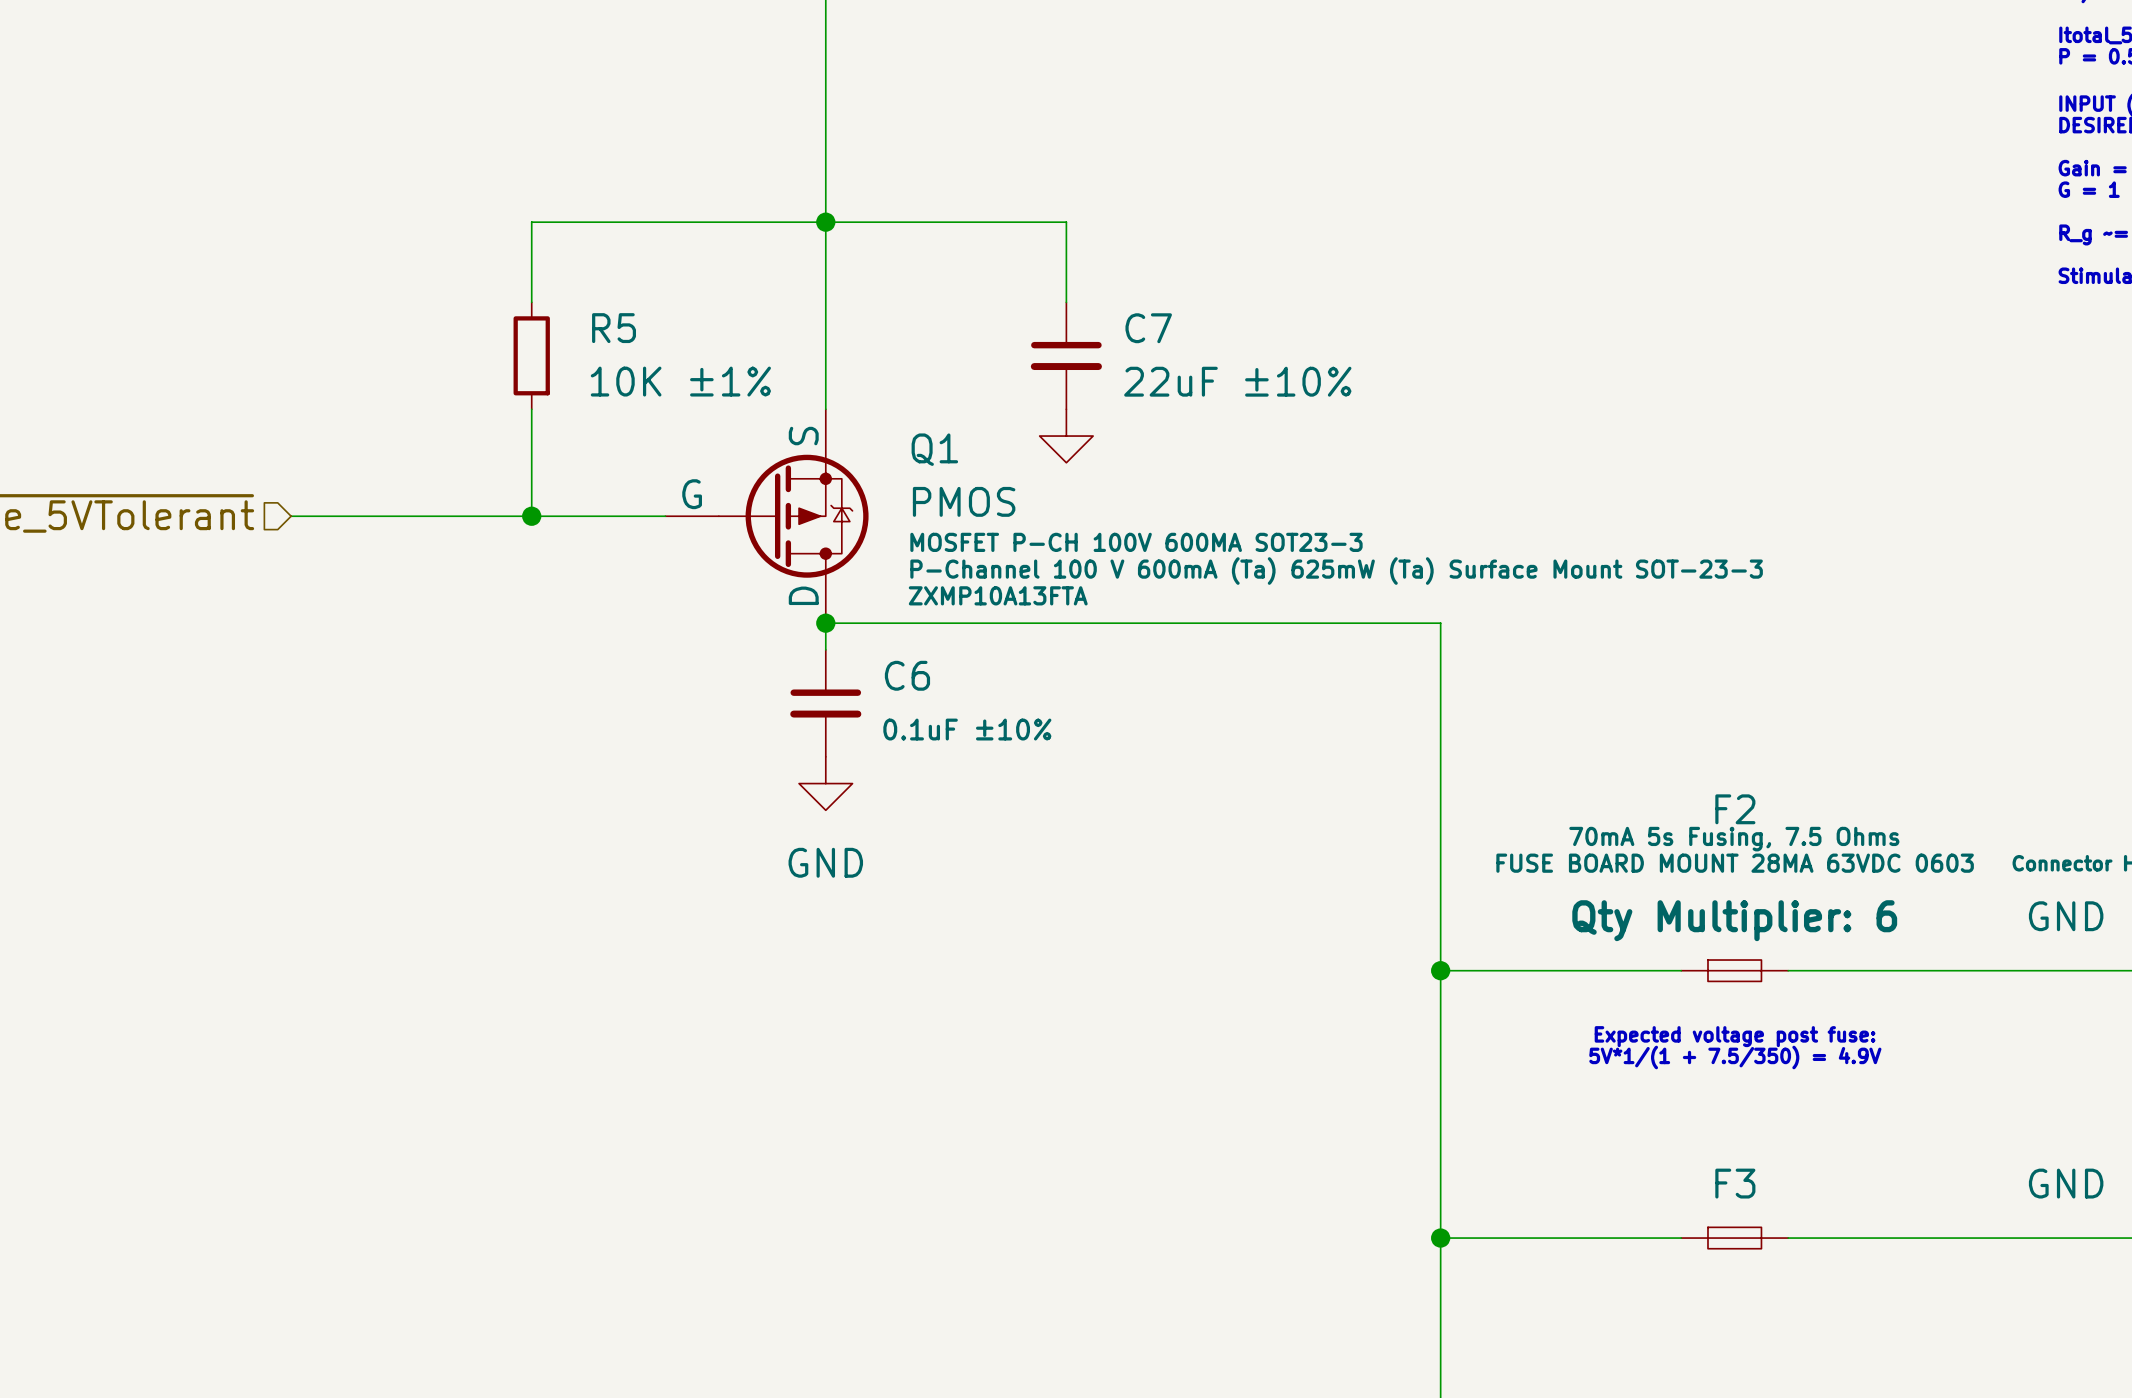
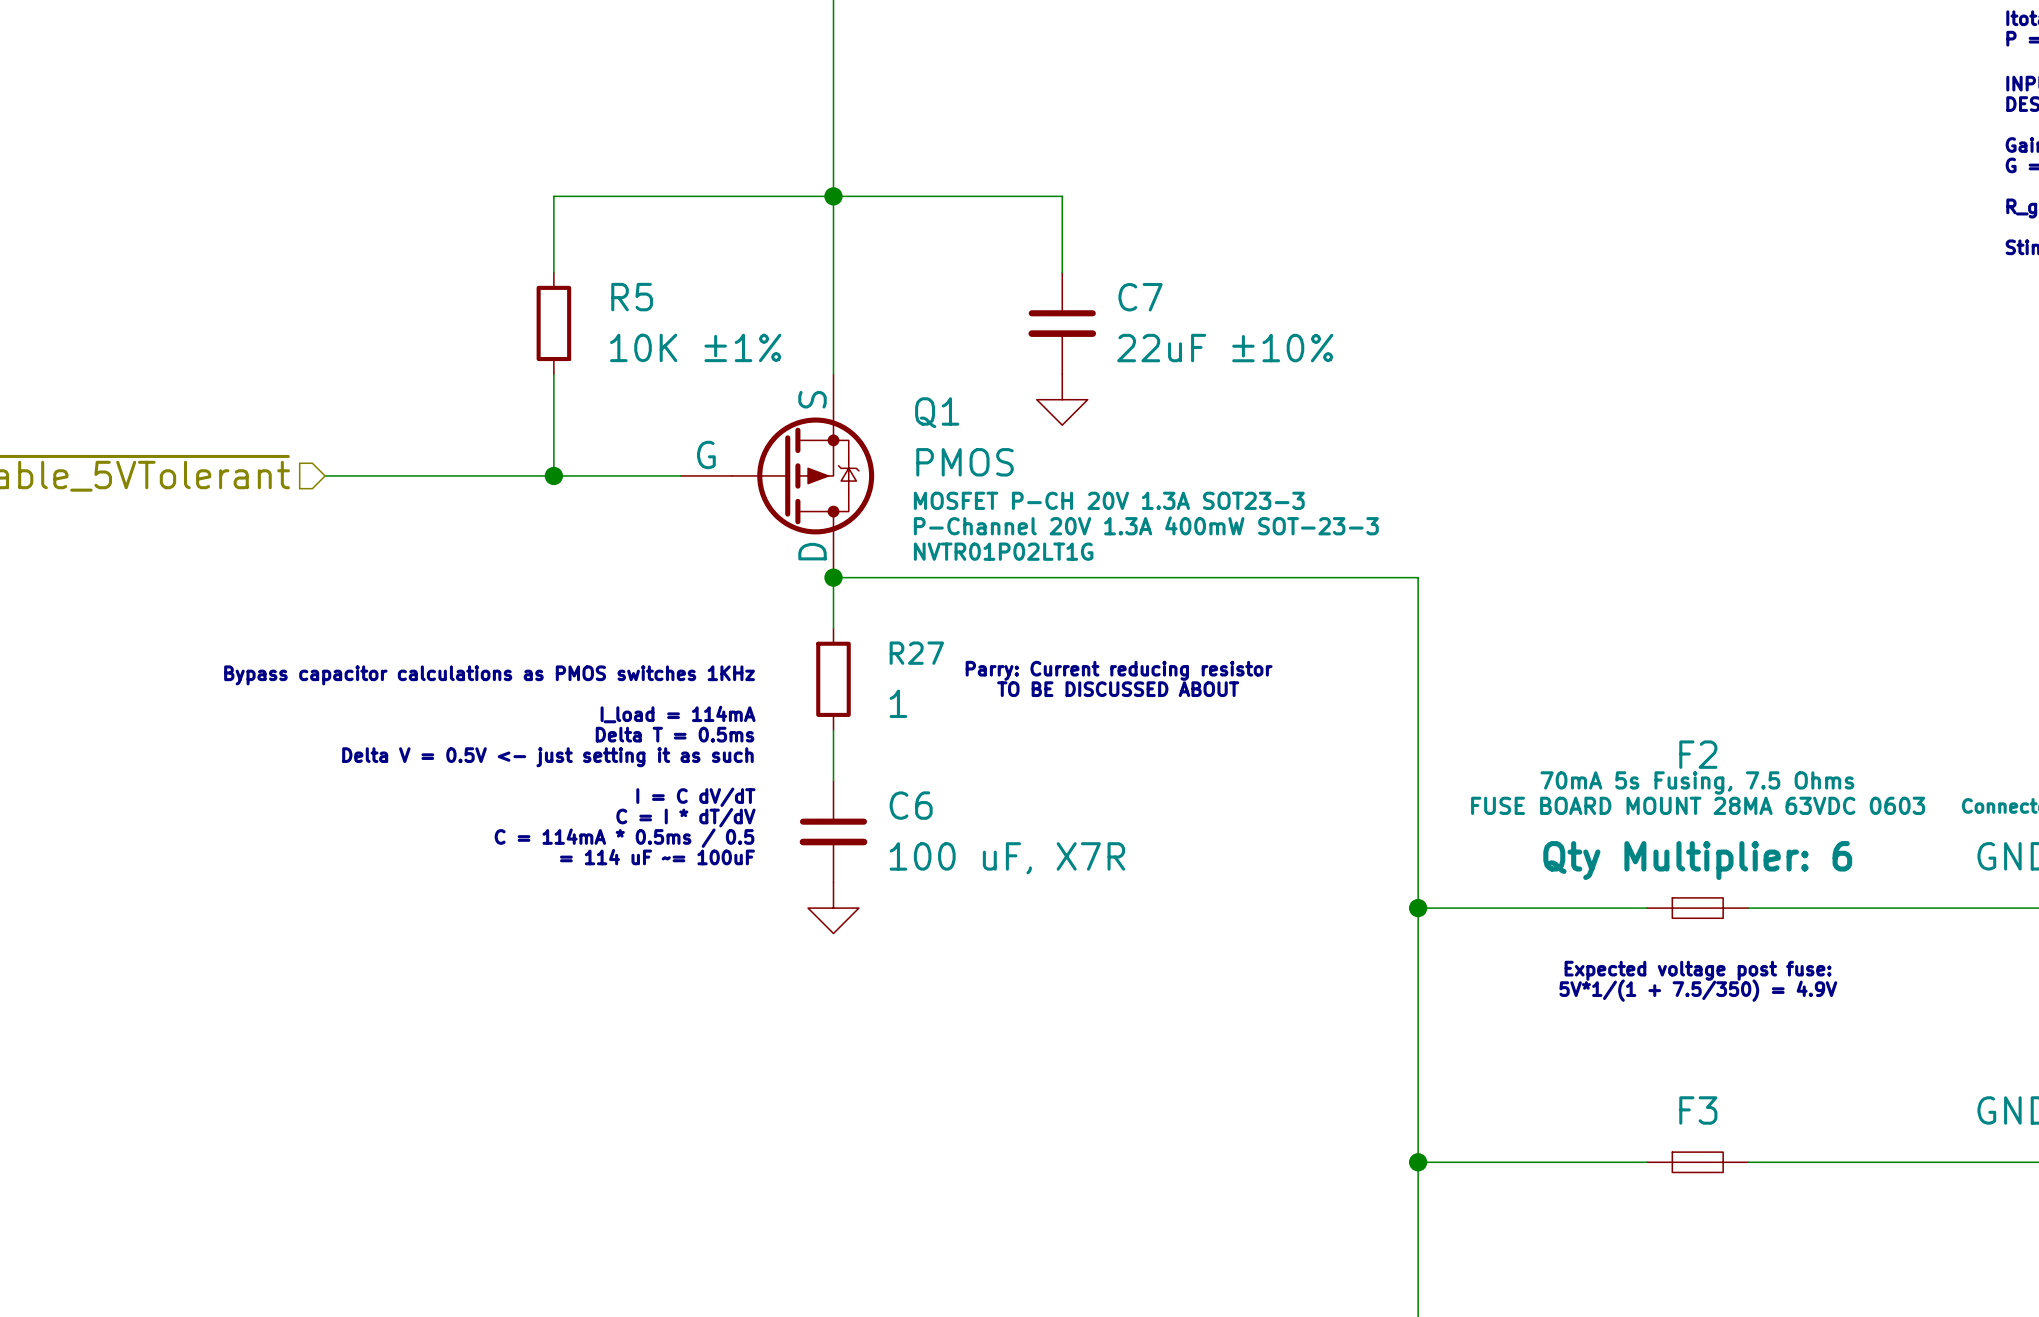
Q1 text: MOSFET P-CH 100V 600MA SOT23-3 (1136, 542) -> MOSFET P-CH 20V 1.3A SOT23-3 (1109, 500)
Q1 text: P-Channel 100 V 600mA (Ta) 625mW (Ta) Surface Mount SOT-23-3 (1336, 571) -> P-Channel 20V 1.3A 400mW SOT-23-3 (1146, 525)
Q1 text: ZXMP10A13FTA (998, 595) -> NVTR01P02LT1G (1003, 551)
C6 position: (825, 703) -> (833, 831)
text: none -> Parry: Current reducing resistor (1119, 670)
text: none -> Bypass capacitor calculations as PMOS switches 1KHz (489, 675)
C6 value: 0.1uF ±10% (967, 729) -> 100 uF, X7R (1007, 858)
R27: none -> 1 (833, 679)
text: none -> TO BE DISCUSSED ABOUT (1118, 689)
text: none -> I_load = 114mA (678, 714)
wire: none -> (833, 730) (833, 780)
power symbol: GND (825, 783) -> none
text: none -> Delta T = 0.5ms (675, 734)
text: none -> Delta V = 0.5V <- just setting it as such (547, 757)
text: none -> I = C dV/dT (695, 797)
text: none -> C = I * dT/dV (685, 817)
text: none -> C = 114mA * 0.5ms / 0.5 (624, 838)
text: none -> = 114 uF ~= 100uF (657, 857)
power symbol: none -> (833, 908)

